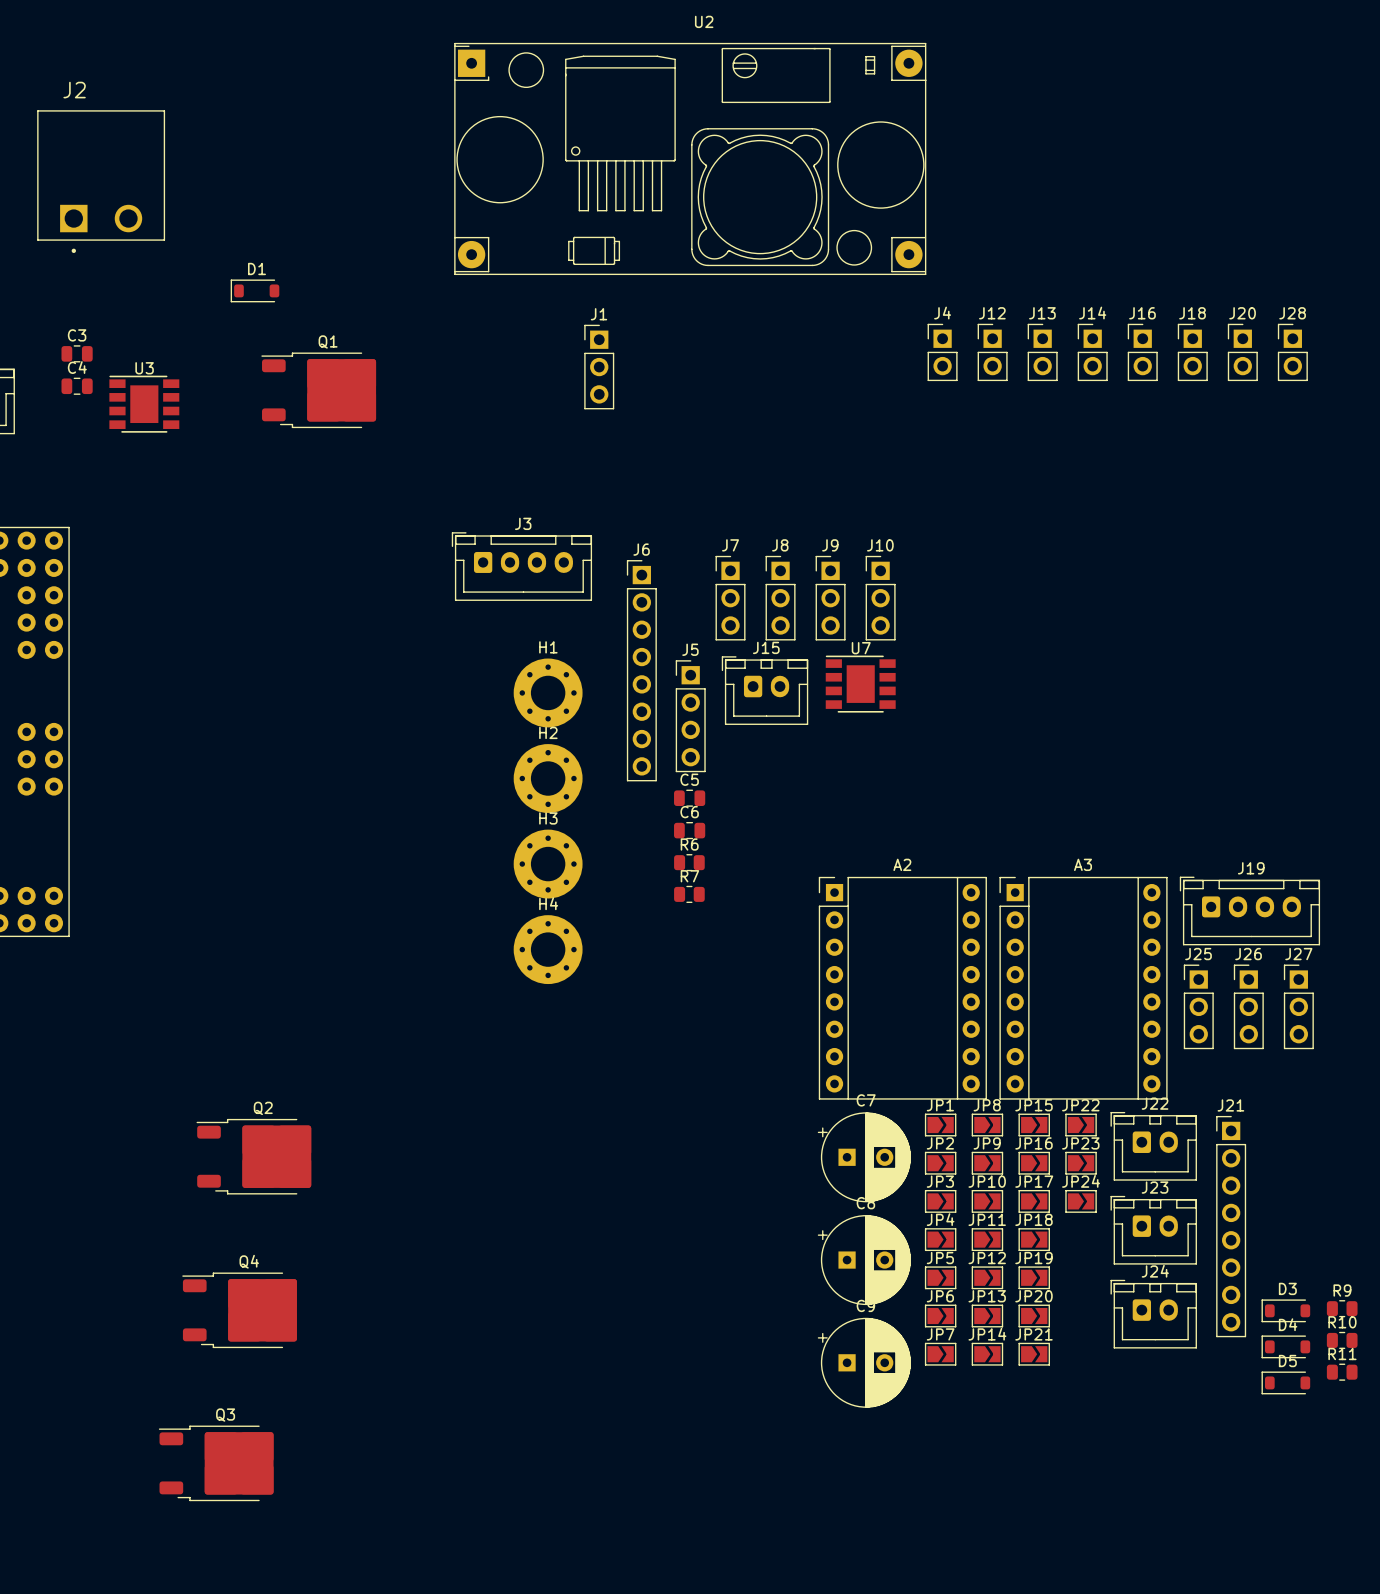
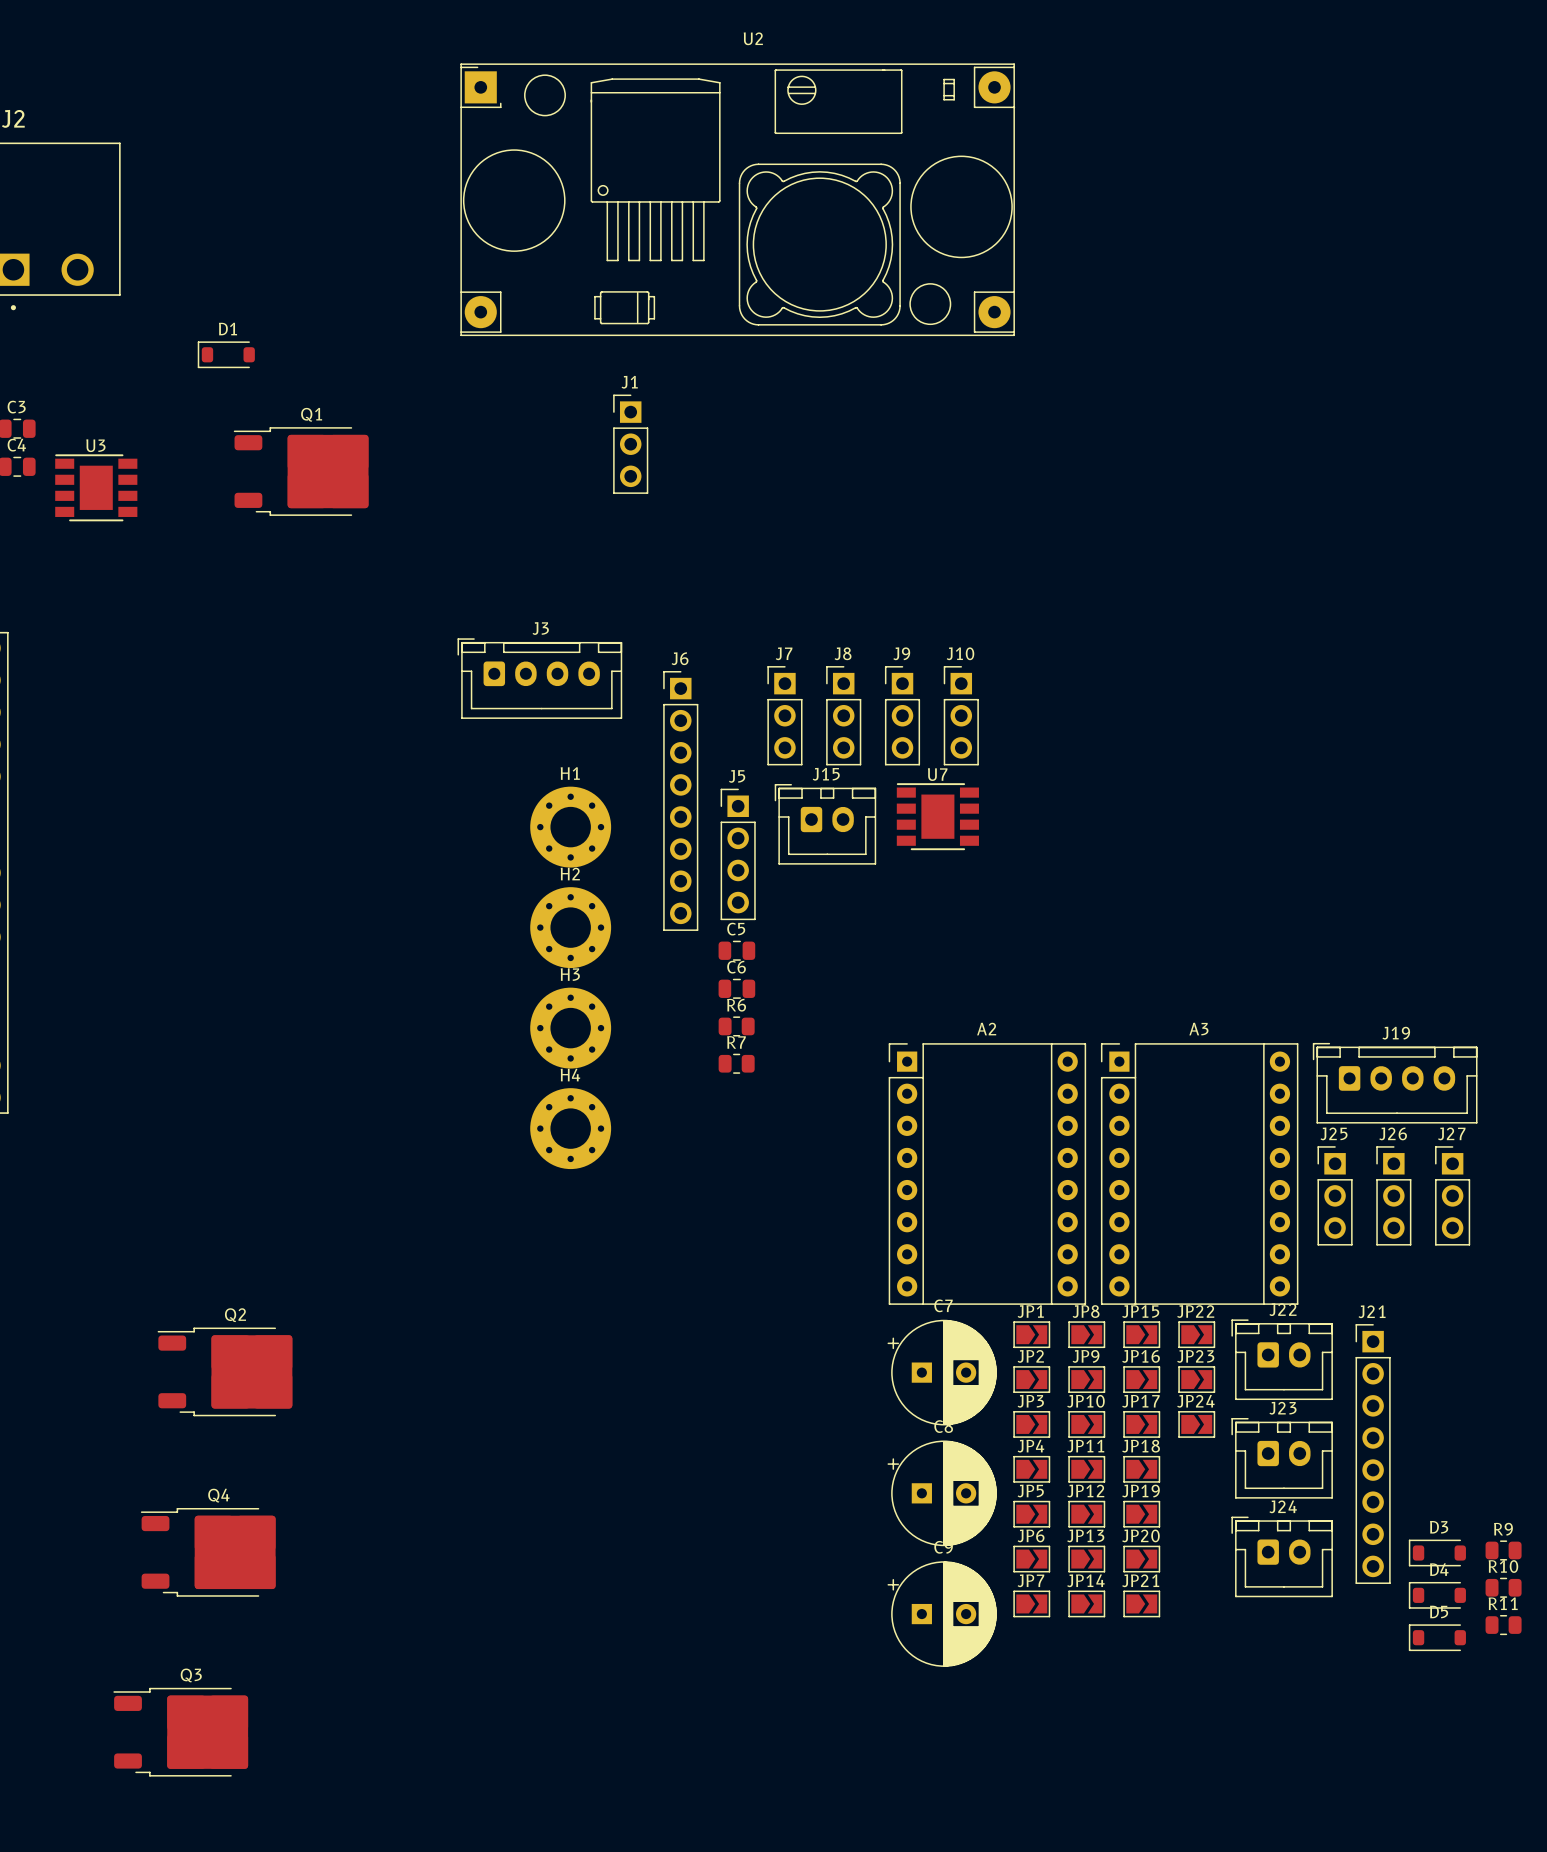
J4: (942, 352) -> none
J12: (992, 352) -> none
J13: (1042, 352) -> none
J14: (1092, 352) -> none
J16: (1142, 352) -> none
J18: (1192, 352) -> none
J20: (1242, 352) -> none
J28: (1292, 352) -> none

